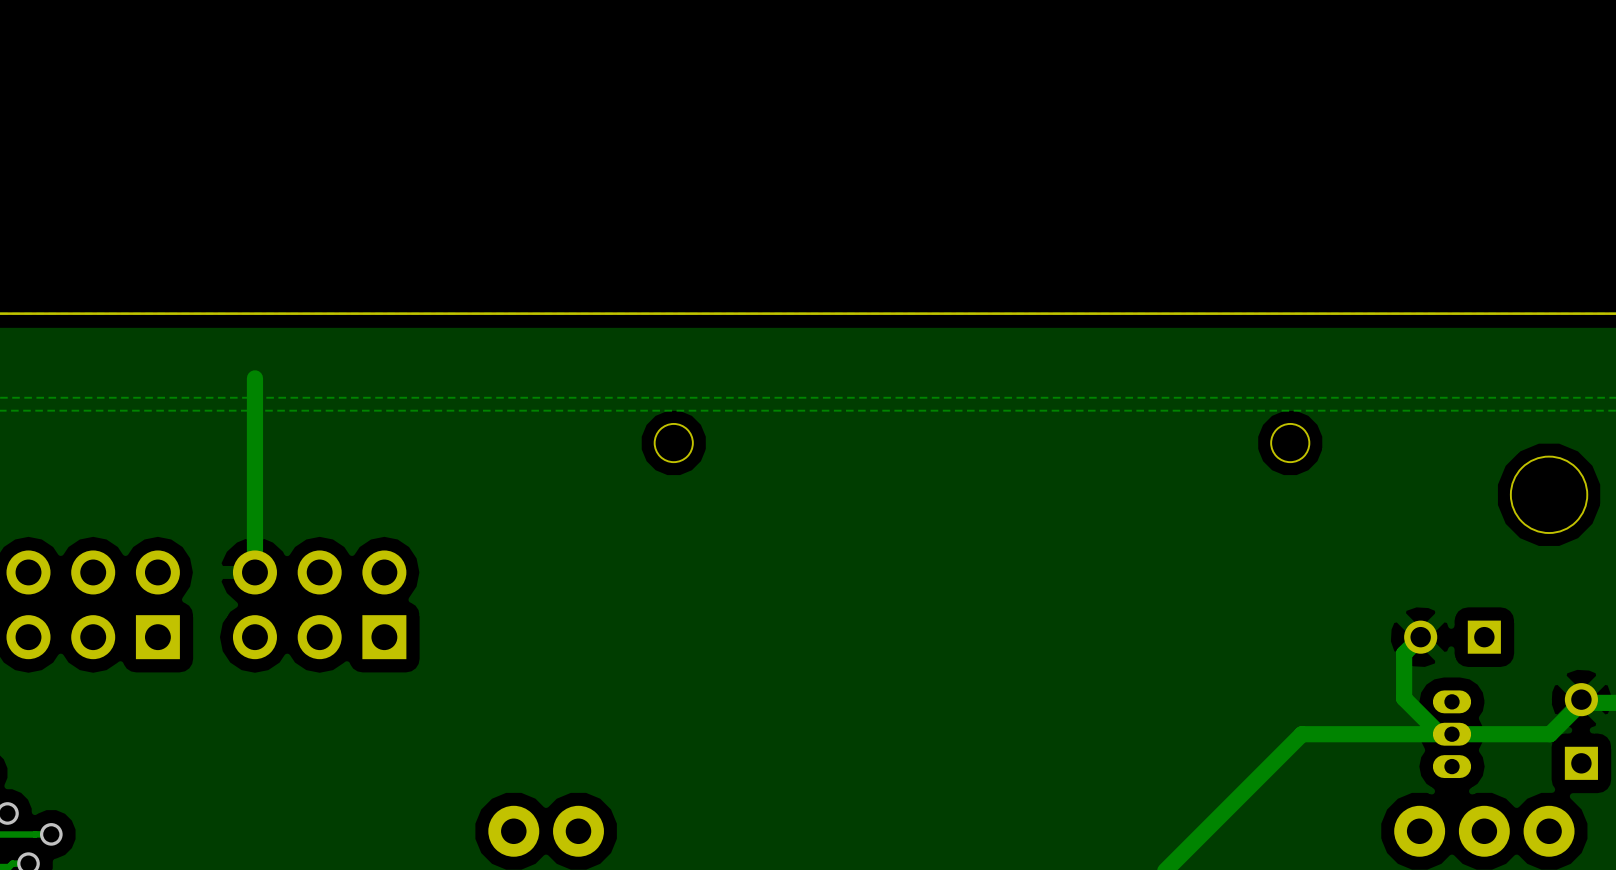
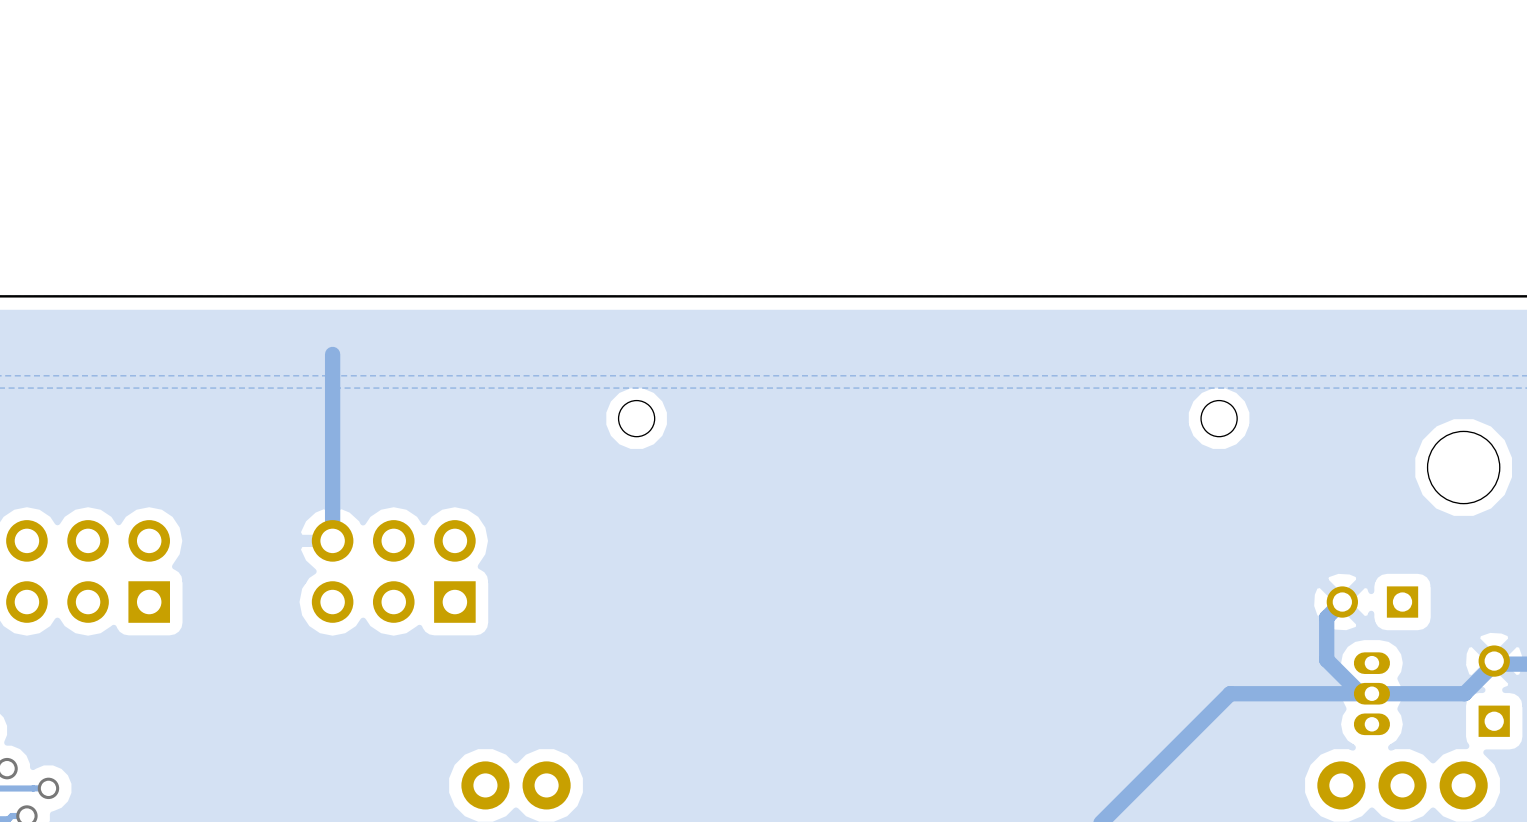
track: none -> (332, 354) (332, 540)
track: (254, 378) (254, 572) -> none
part position: (319, 604) -> (393, 571)

